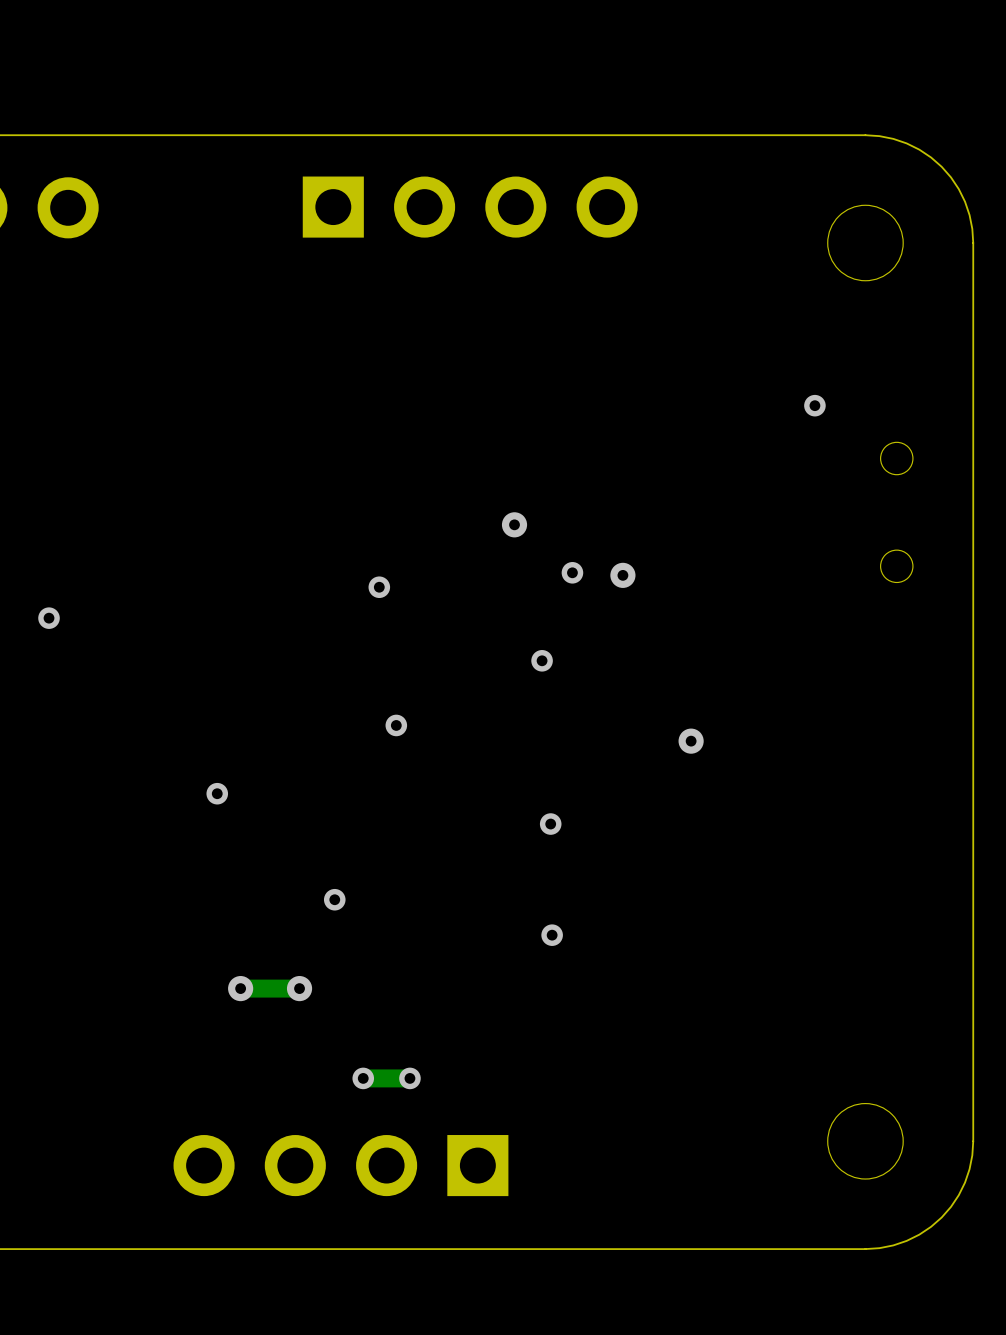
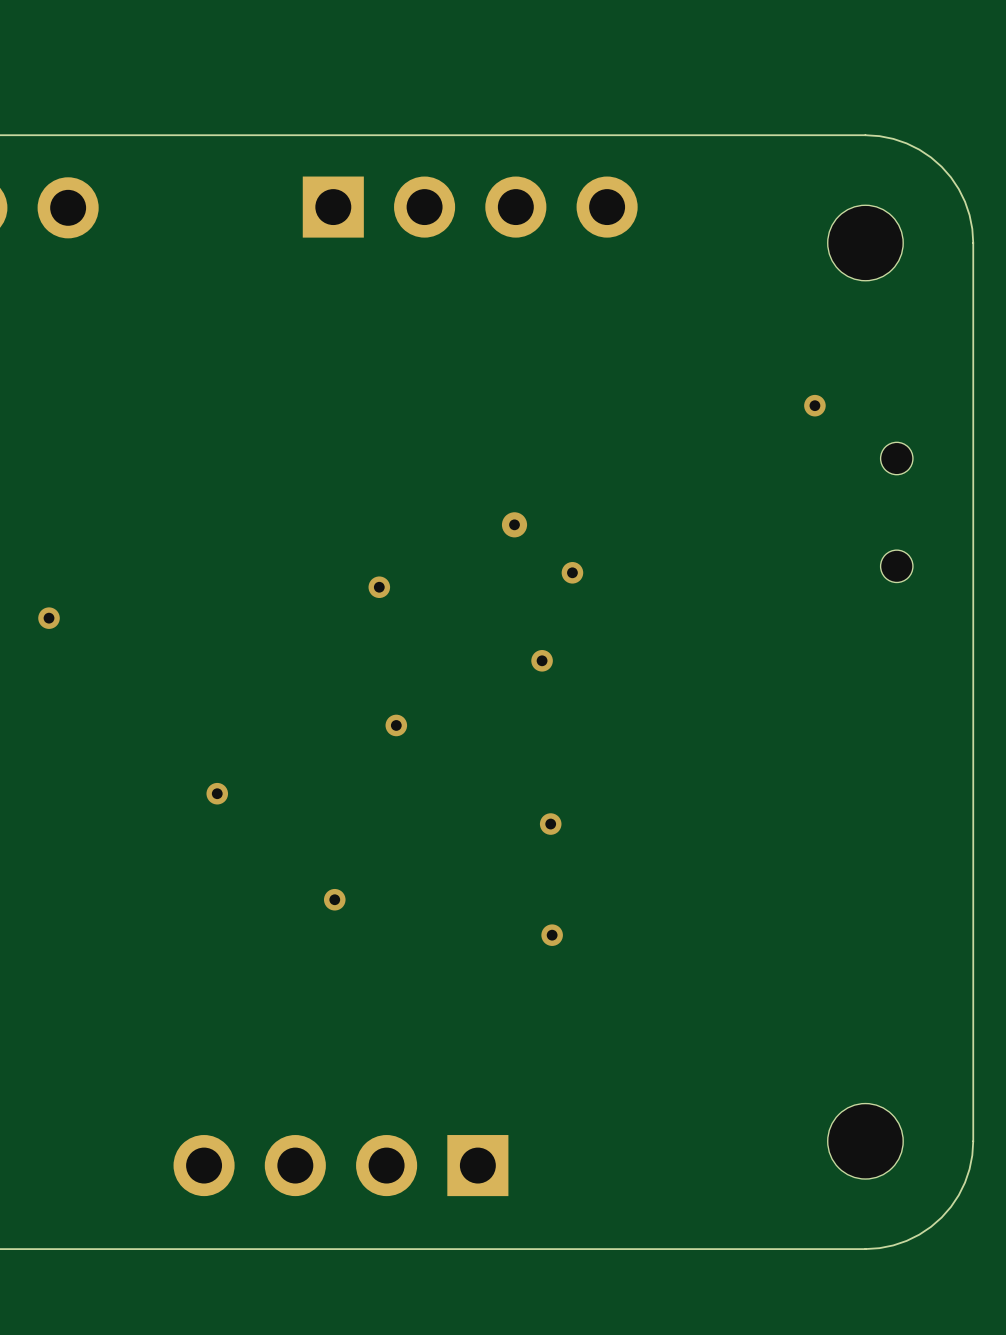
via: (622, 575) -> none
via: (691, 741) -> none
via: (240, 988) -> none
track: (299, 988) (240, 988) -> none
via: (299, 988) -> none
via: (363, 1078) -> none
track: (409, 1078) (363, 1078) -> none
via: (409, 1078) -> none

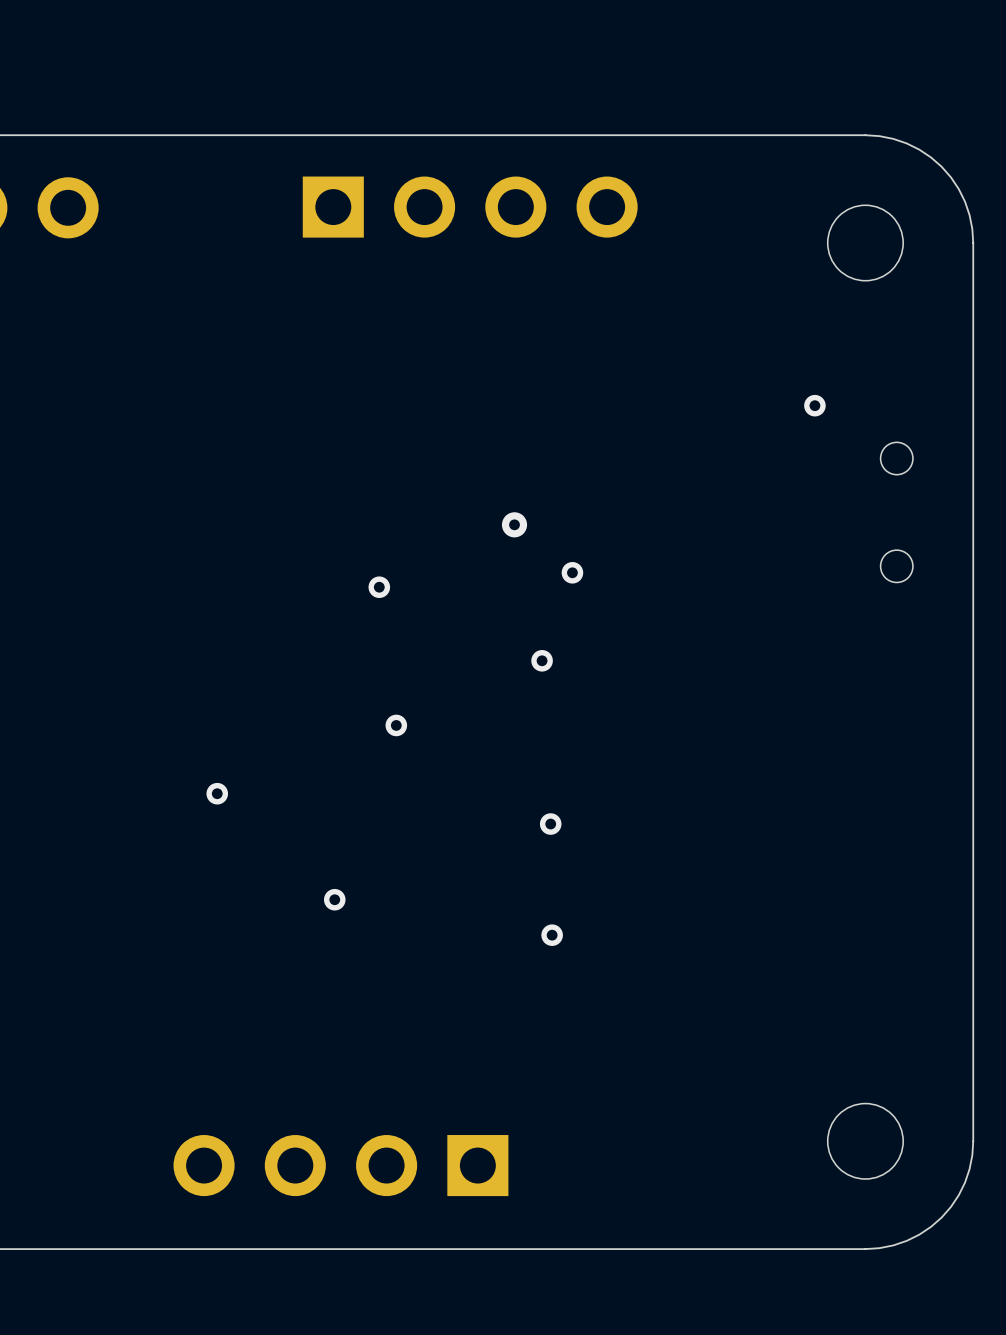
via: (49, 618) -> none

